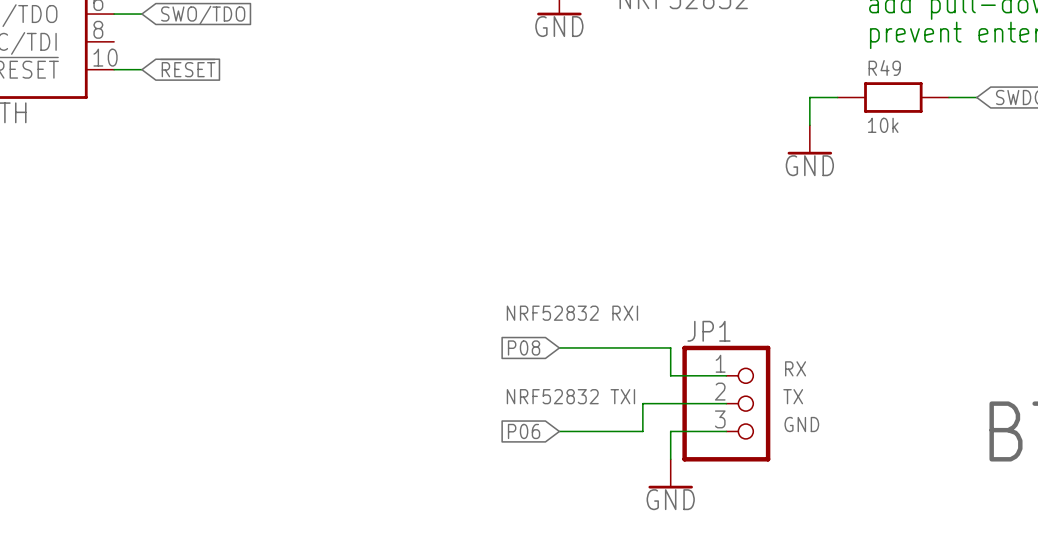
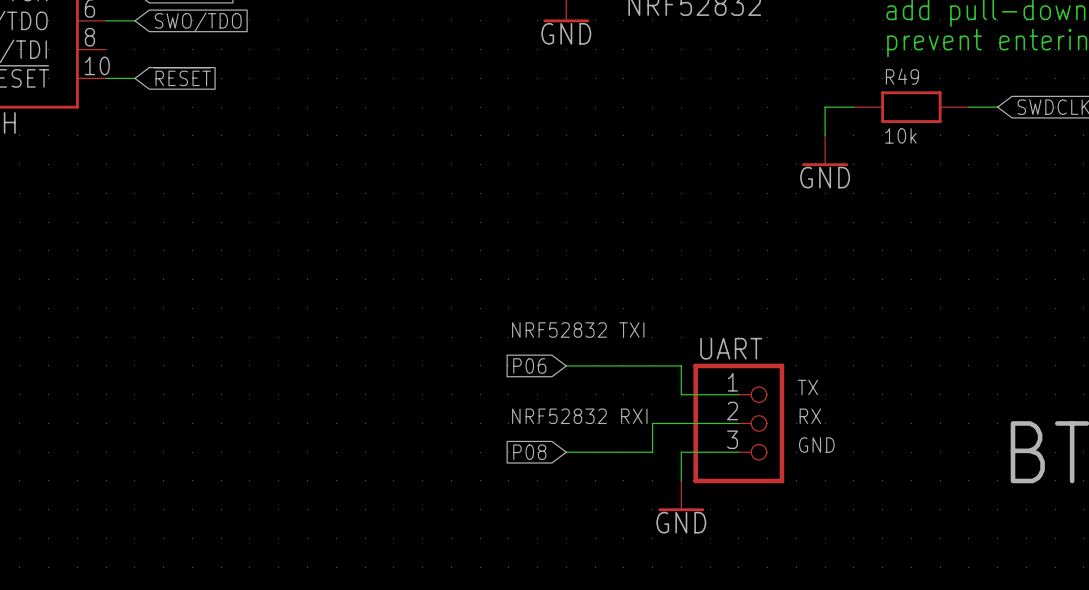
text: NRF52832 RXI (572, 313) -> NRF52832 TXI (578, 330)
JP1 name: JP1 (709, 331) -> UART (731, 348)
global label: P08 (524, 347) -> P06 (529, 365)
text: RX (795, 368) -> TX (807, 387)
text: NRF52832 TXI (570, 396) -> NRF52832 RXI (579, 416)
text: TX (793, 396) -> RX (810, 416)
global label: P06 (524, 431) -> P08 (529, 452)

